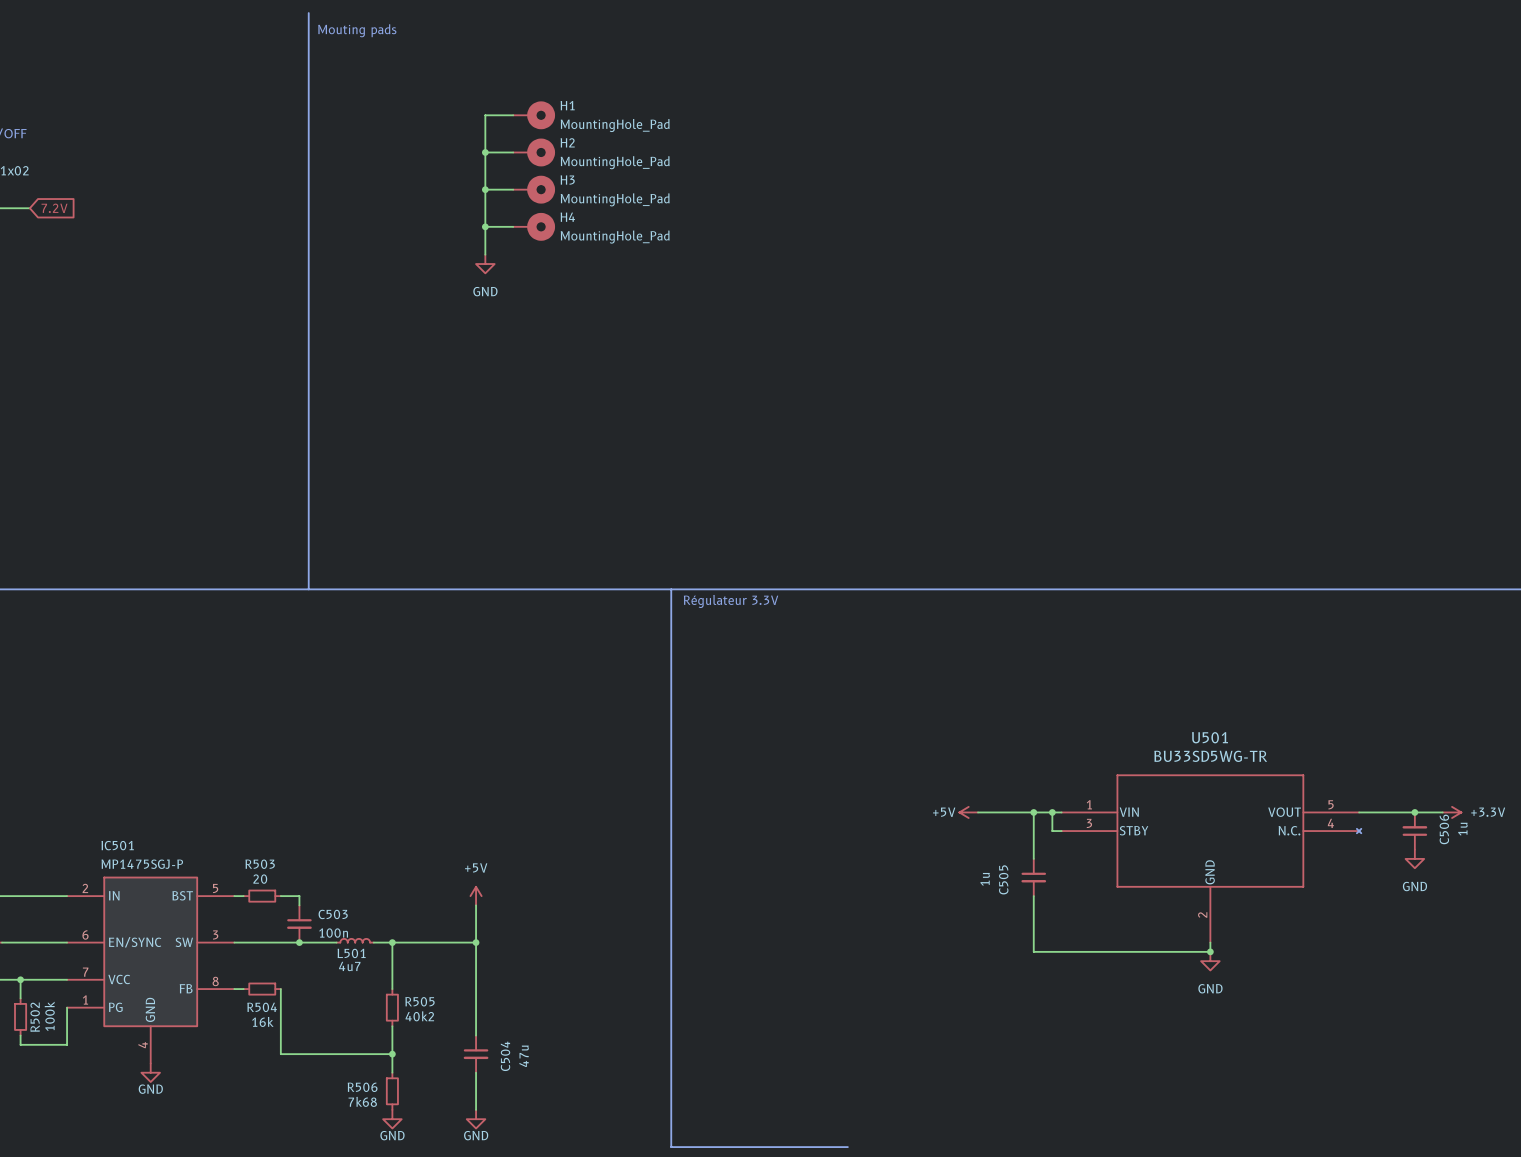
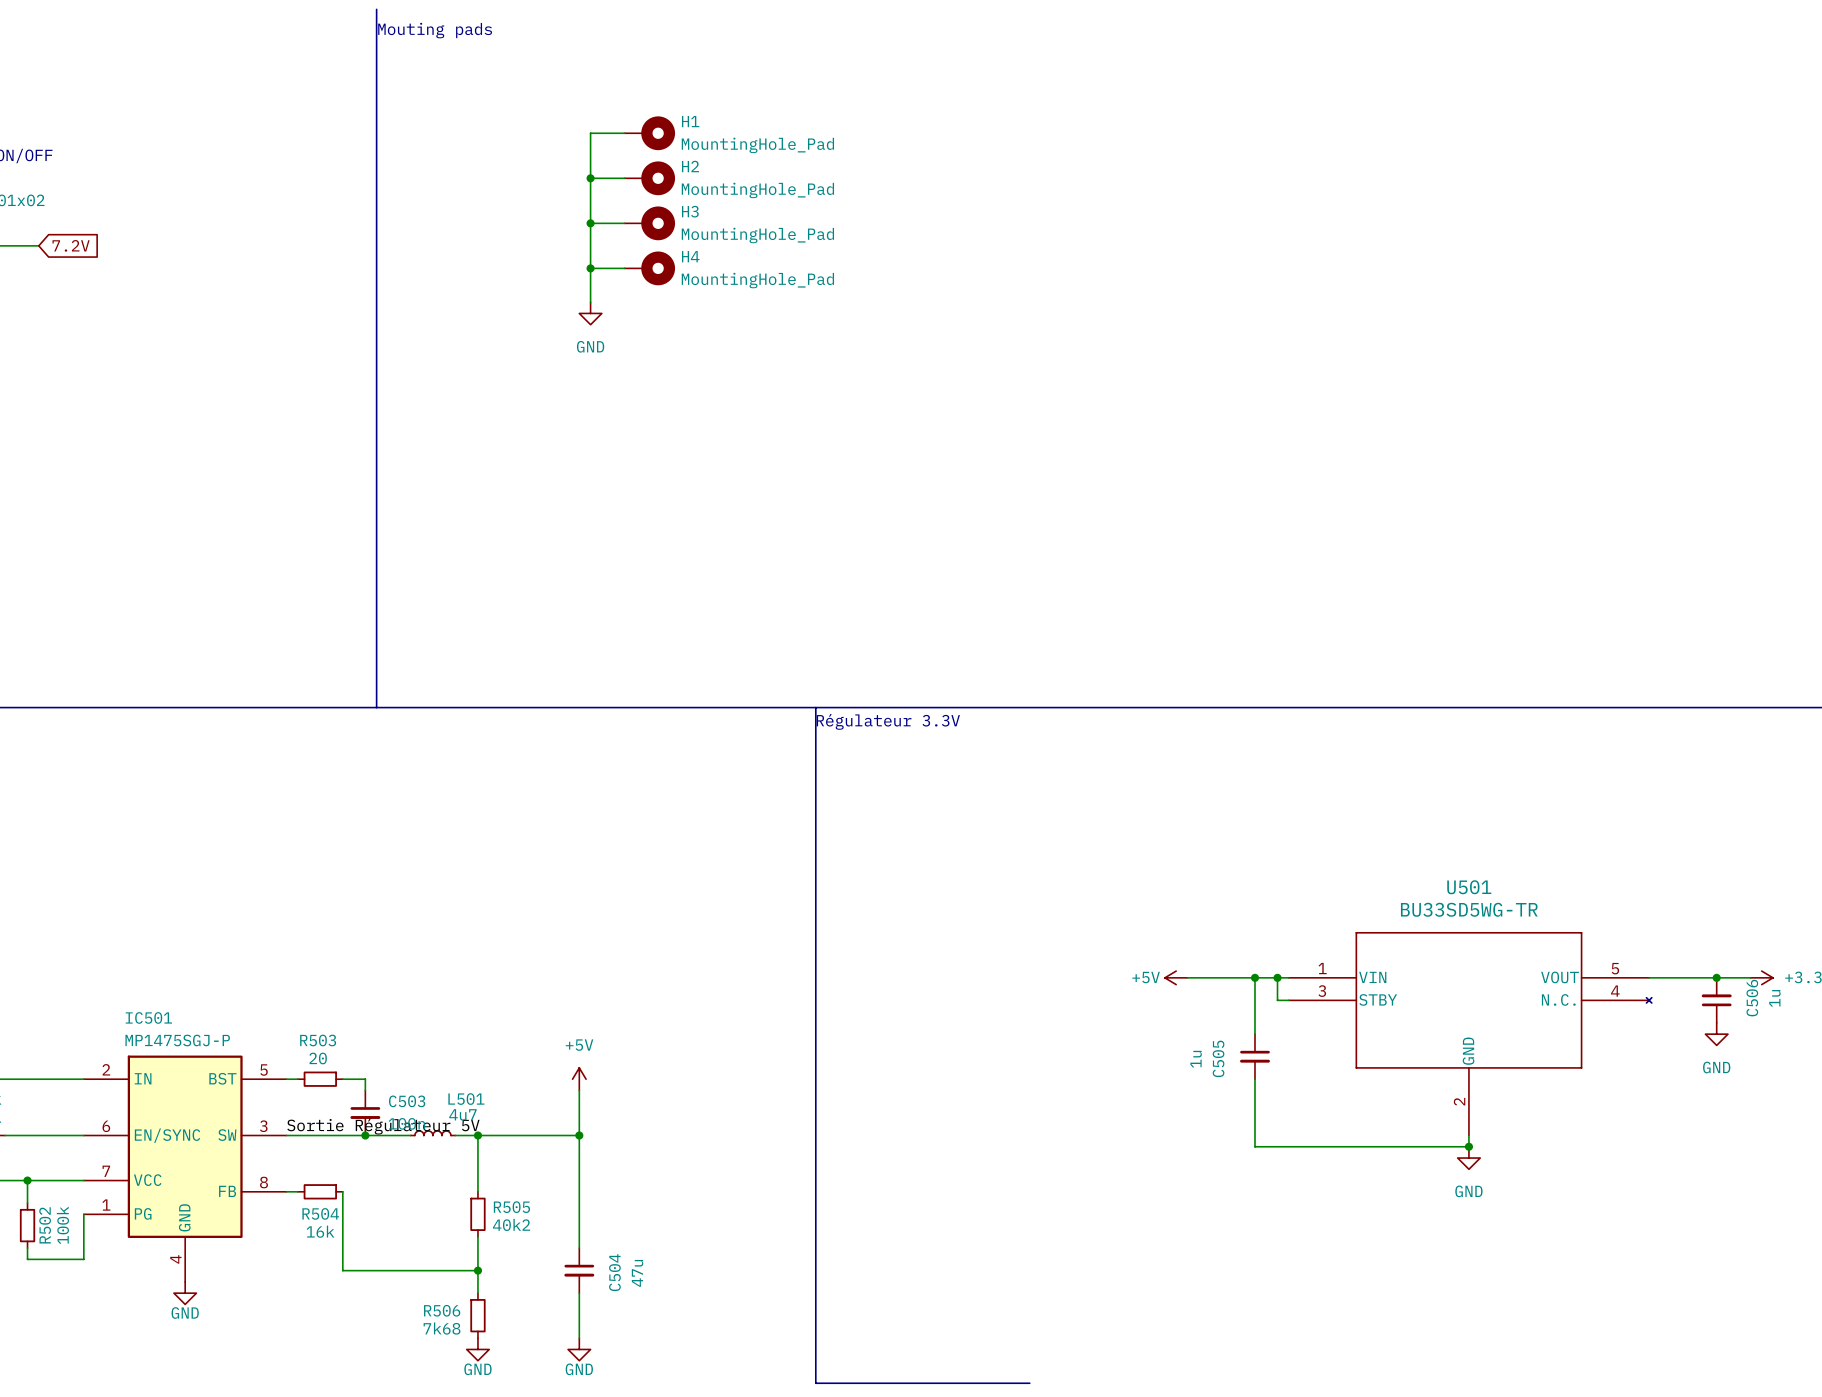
label: none -> Sortie Régulateur 5V (383, 1126)
L501 name position: L501 (351, 953) -> L501 (466, 1099)
L501 value position: 4u7 (349, 966) -> 4u7 (462, 1114)

